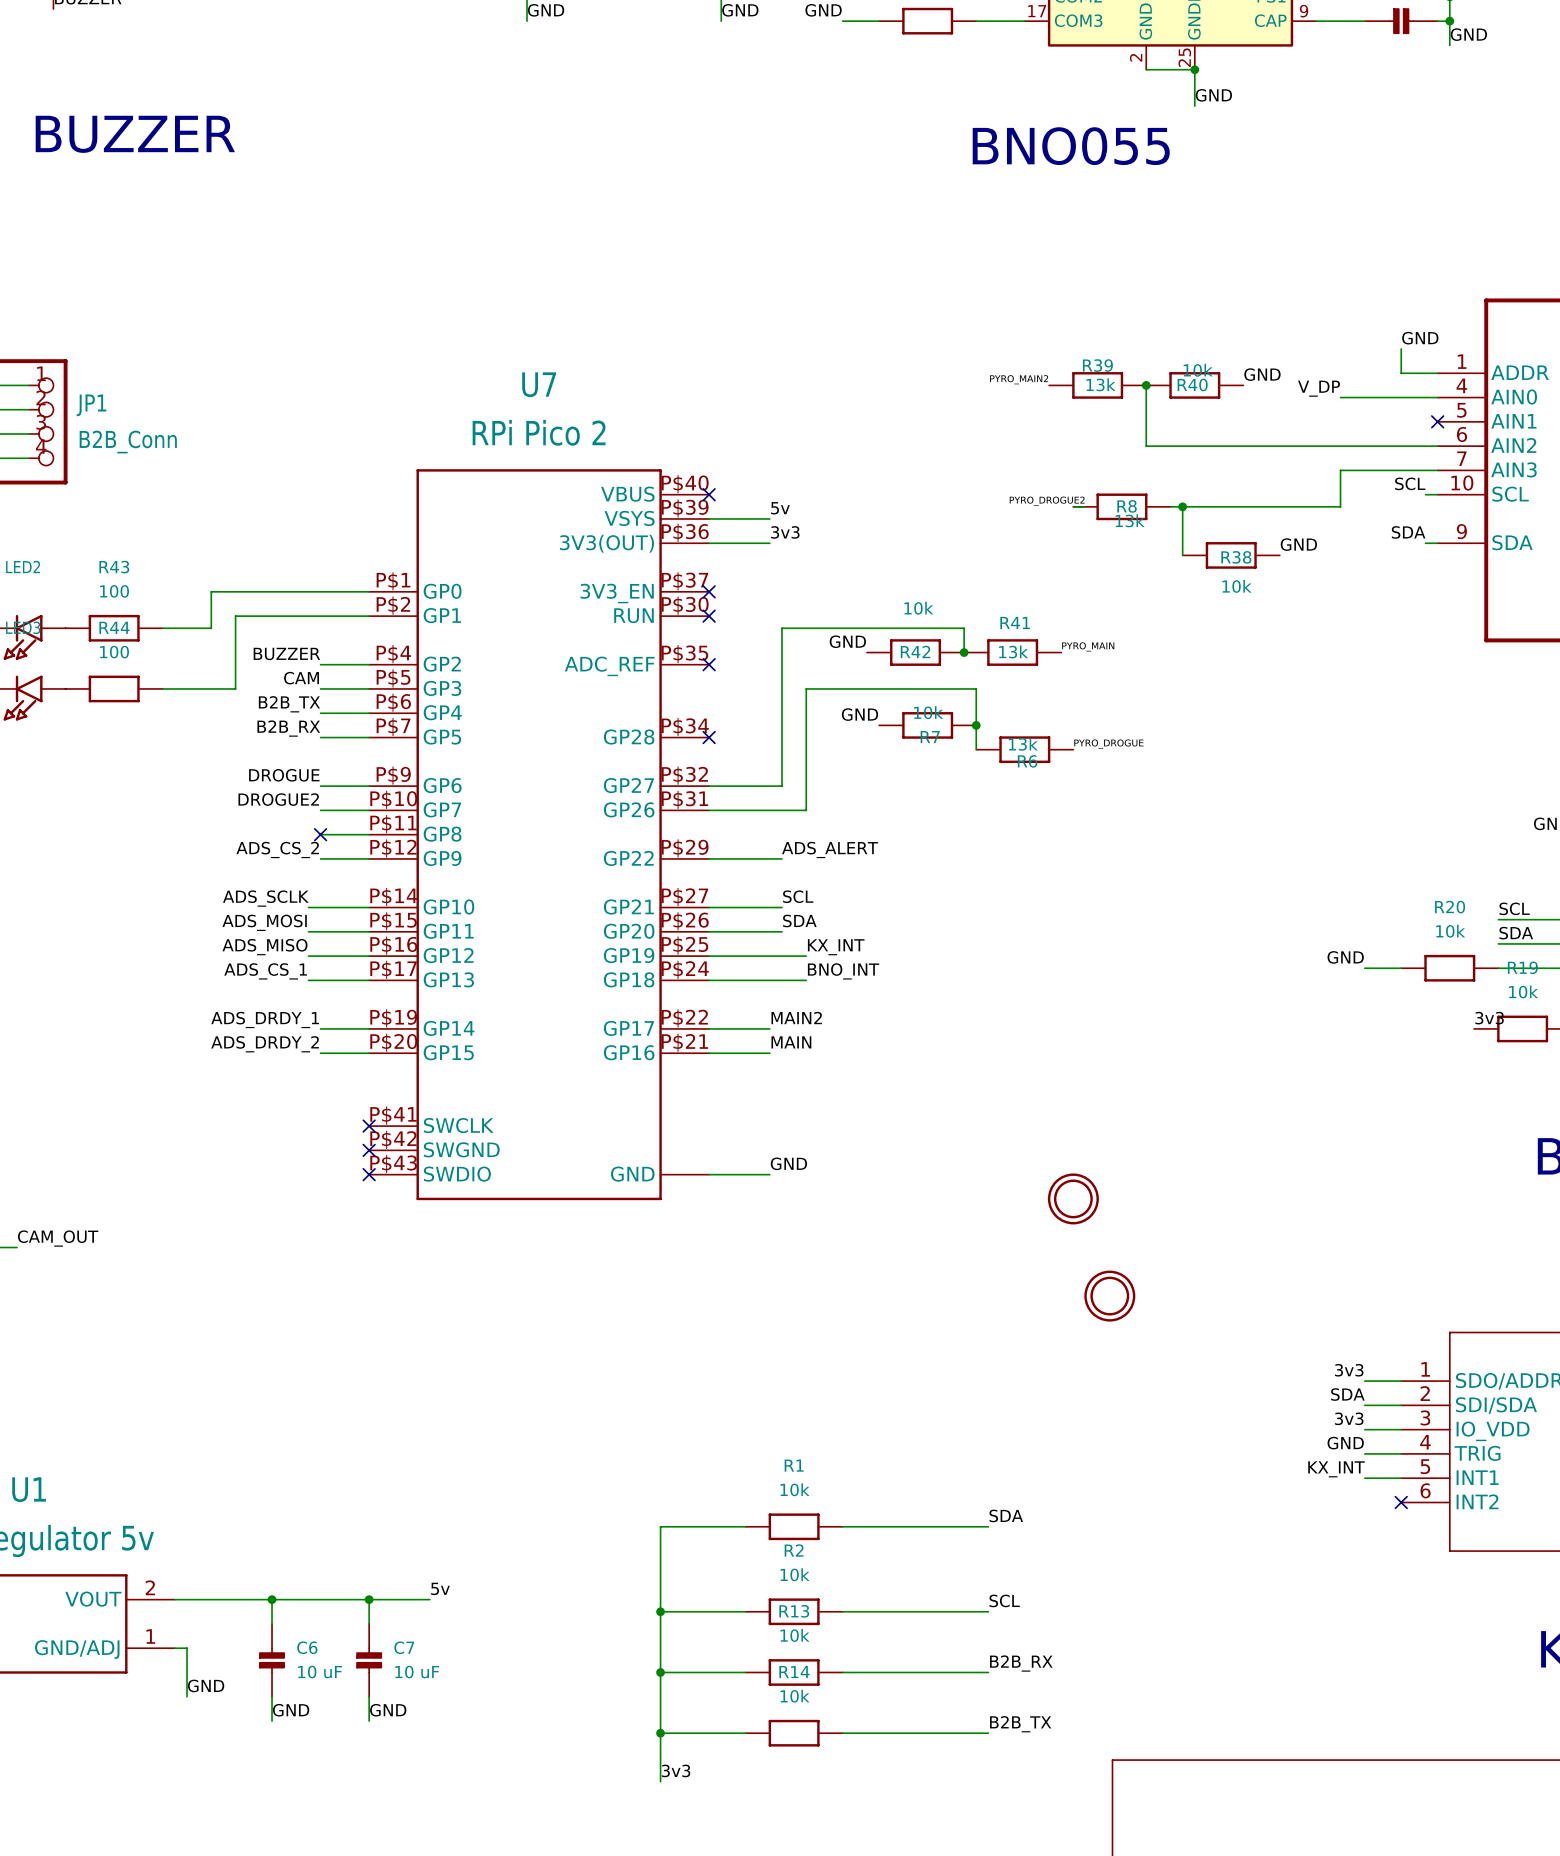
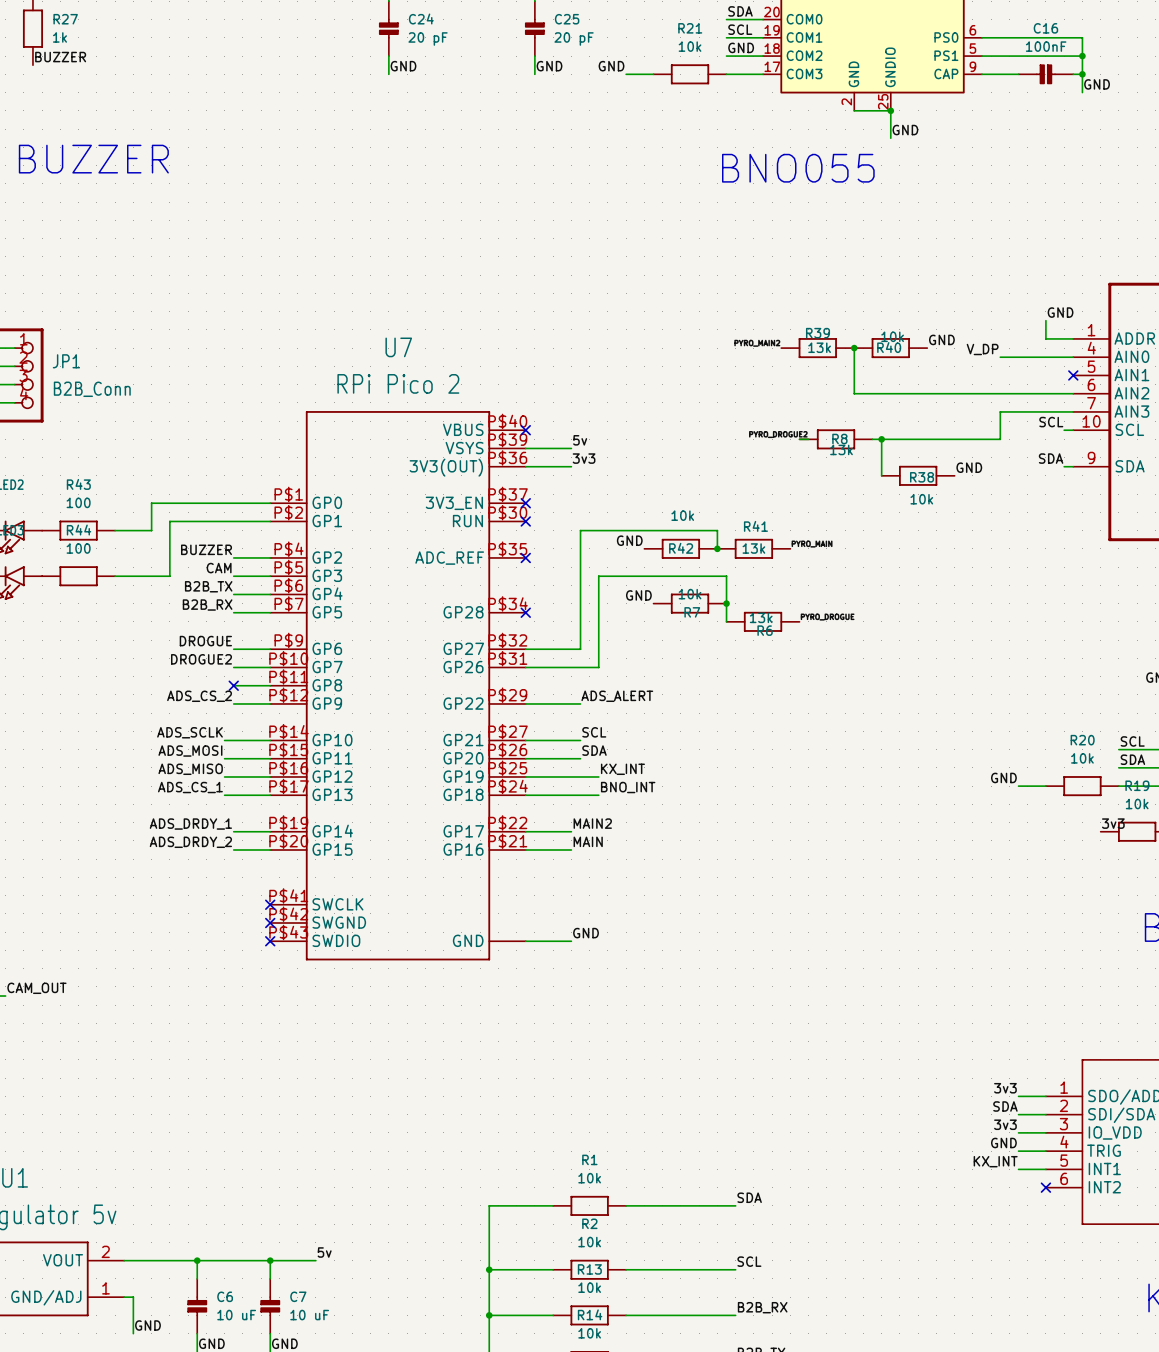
part: (1073, 1198) -> none
part: (1109, 1296) -> none

